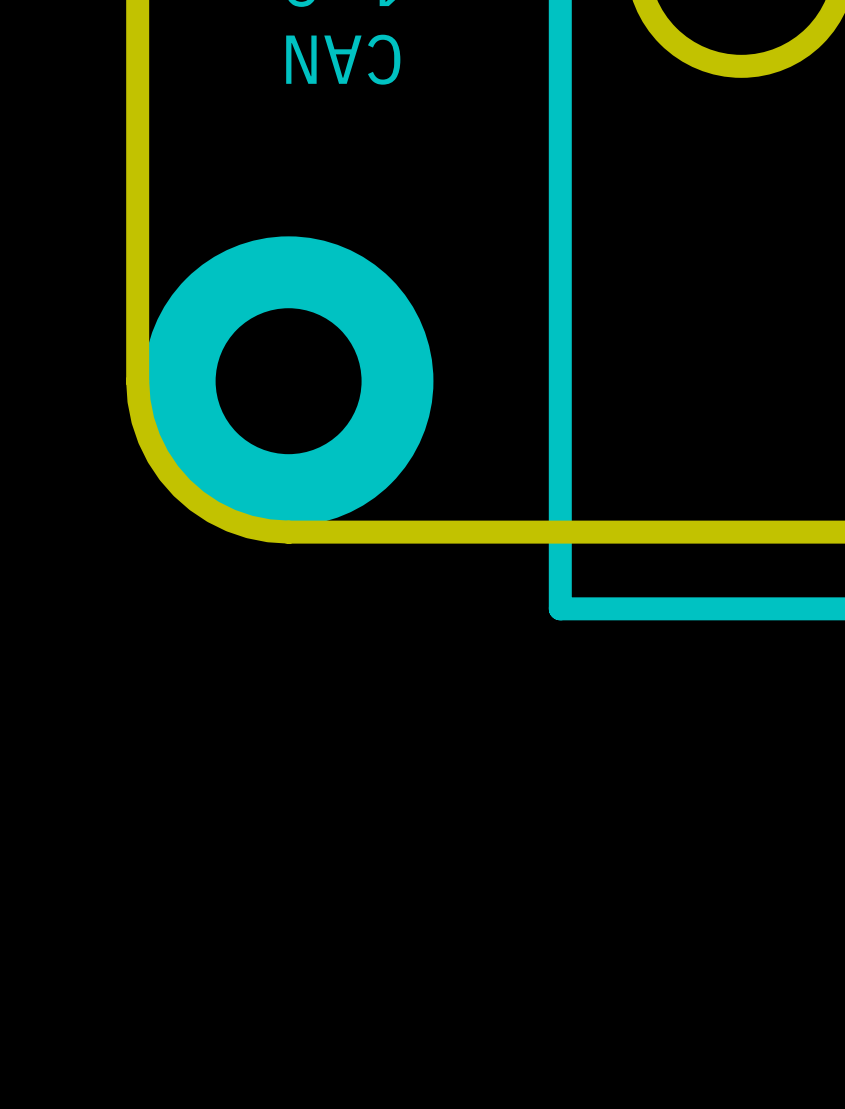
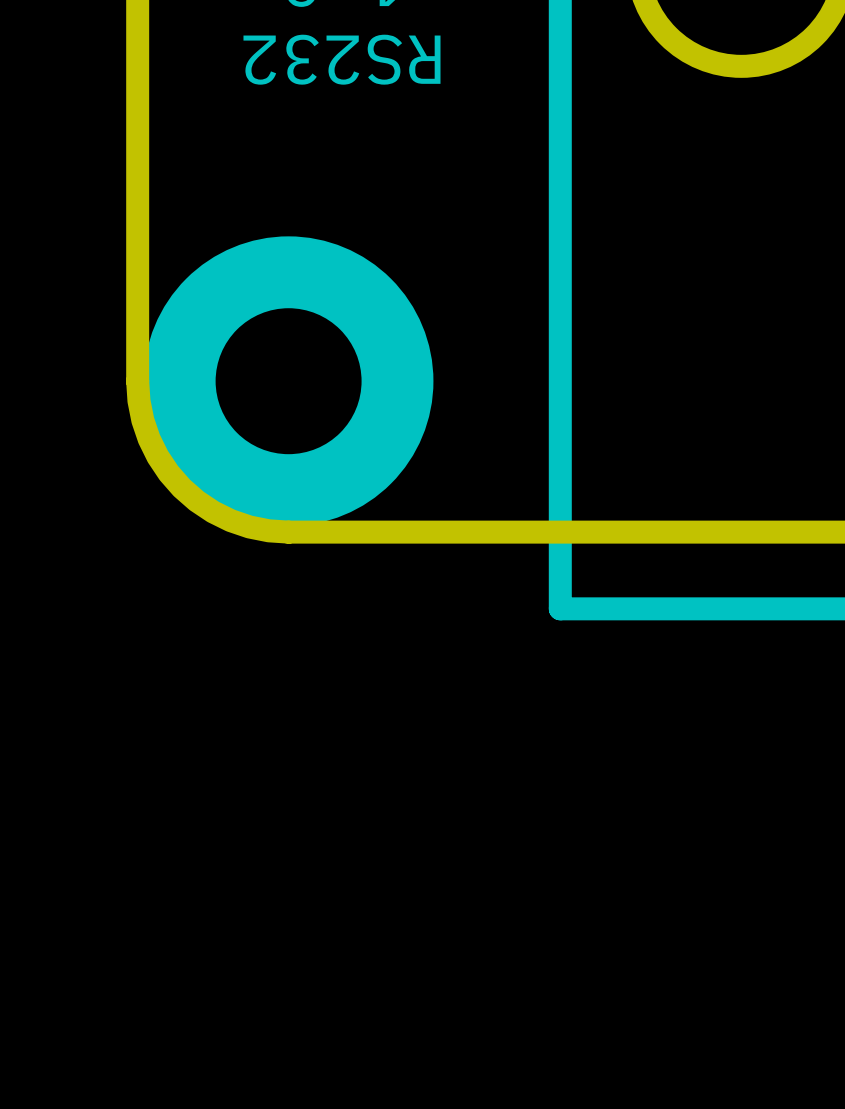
text: CAN (343, 59) -> RS232 (341, 59)

